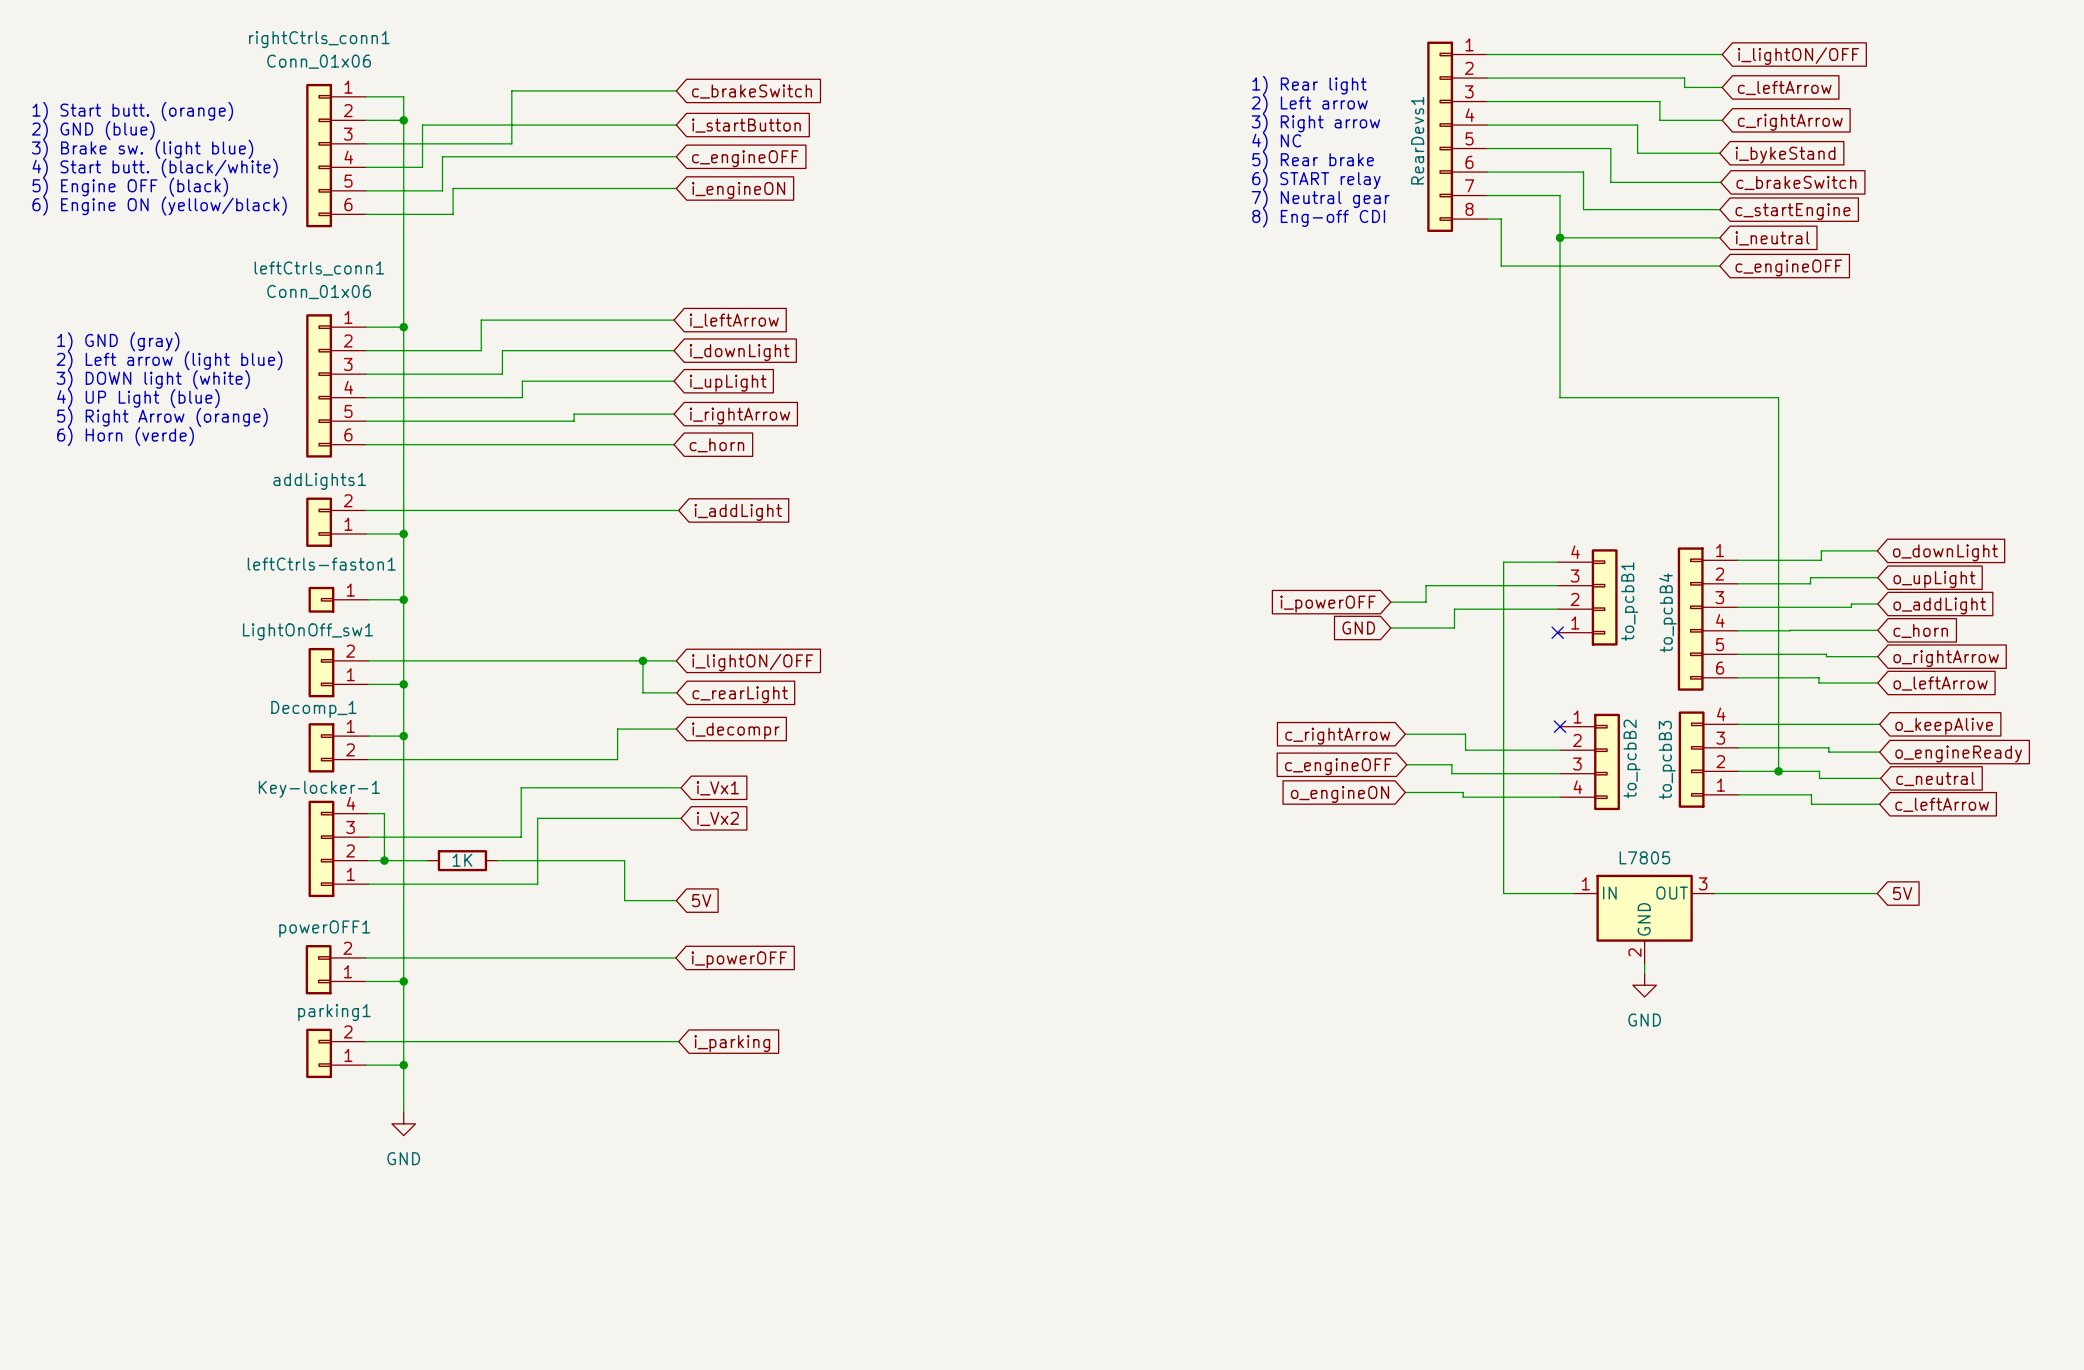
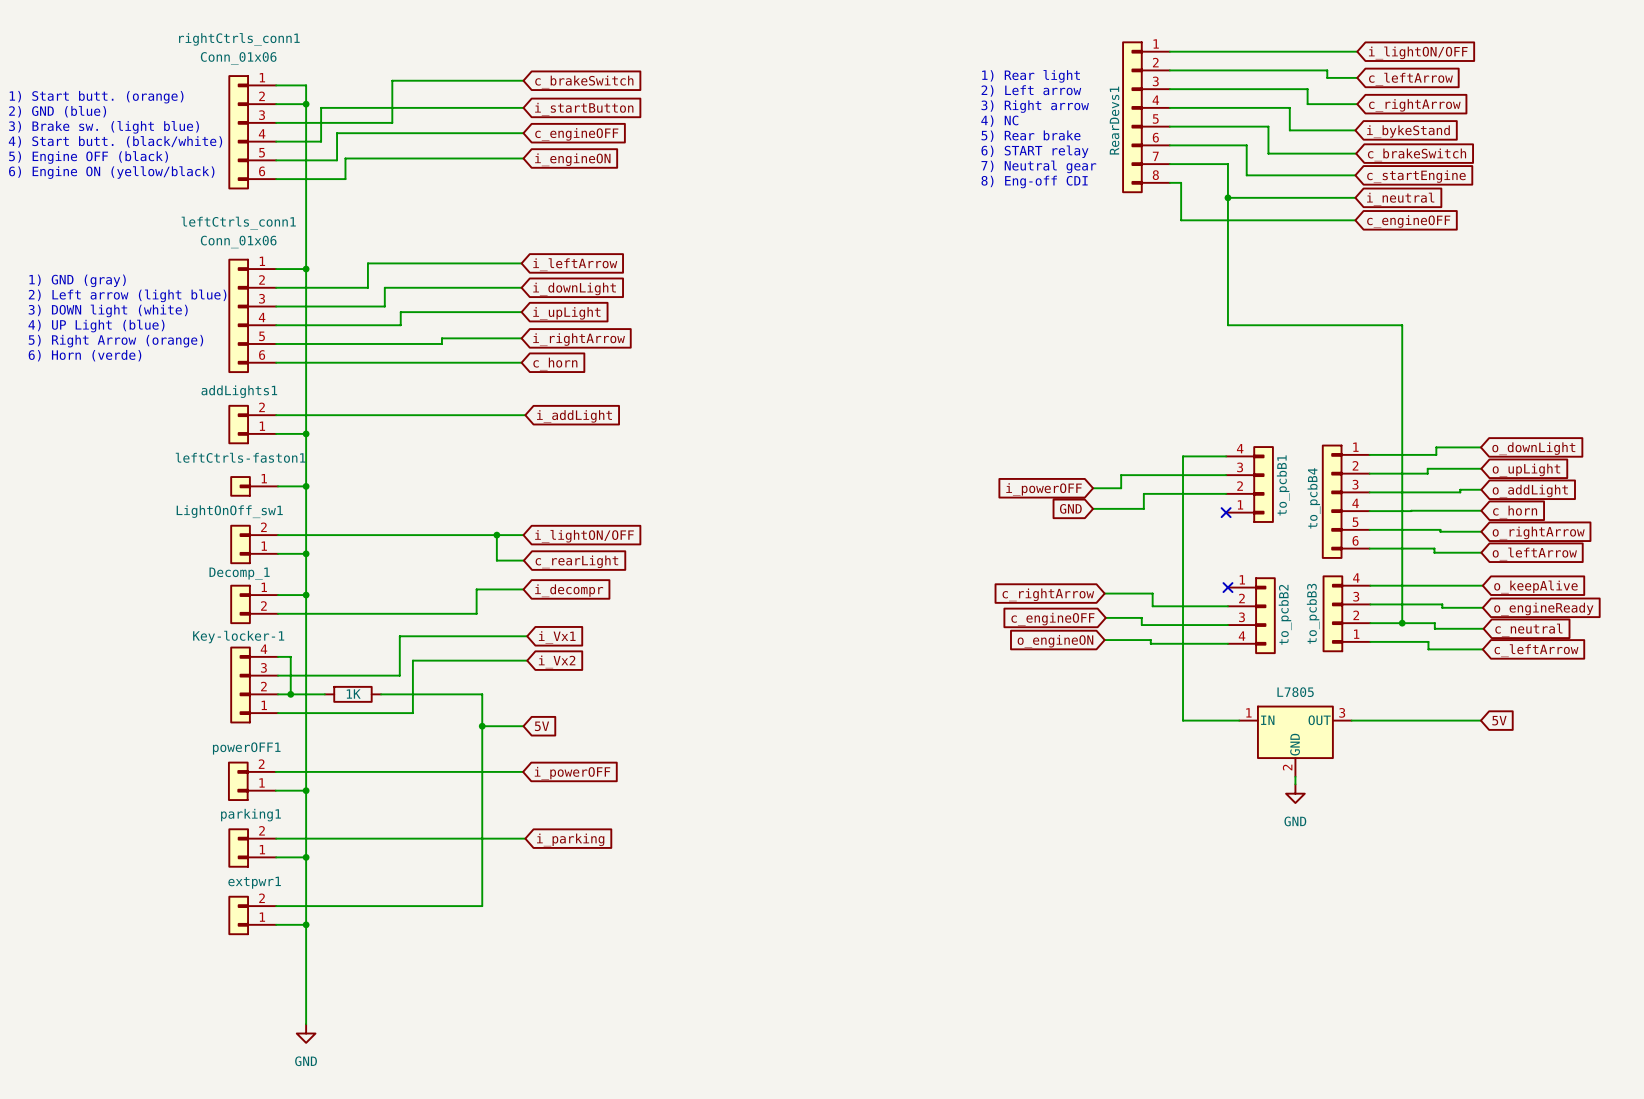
wire: none -> (482, 726) (482, 906) (276, 906)
junction: none -> (482, 726)
wire: none -> (306, 894) (306, 1024)
power symbol position: GND (403, 1123) -> GND (306, 1033)
extpwr1: none -> (252, 915)
wire: none -> (276, 924) (306, 924)
junction: none -> (306, 924)

